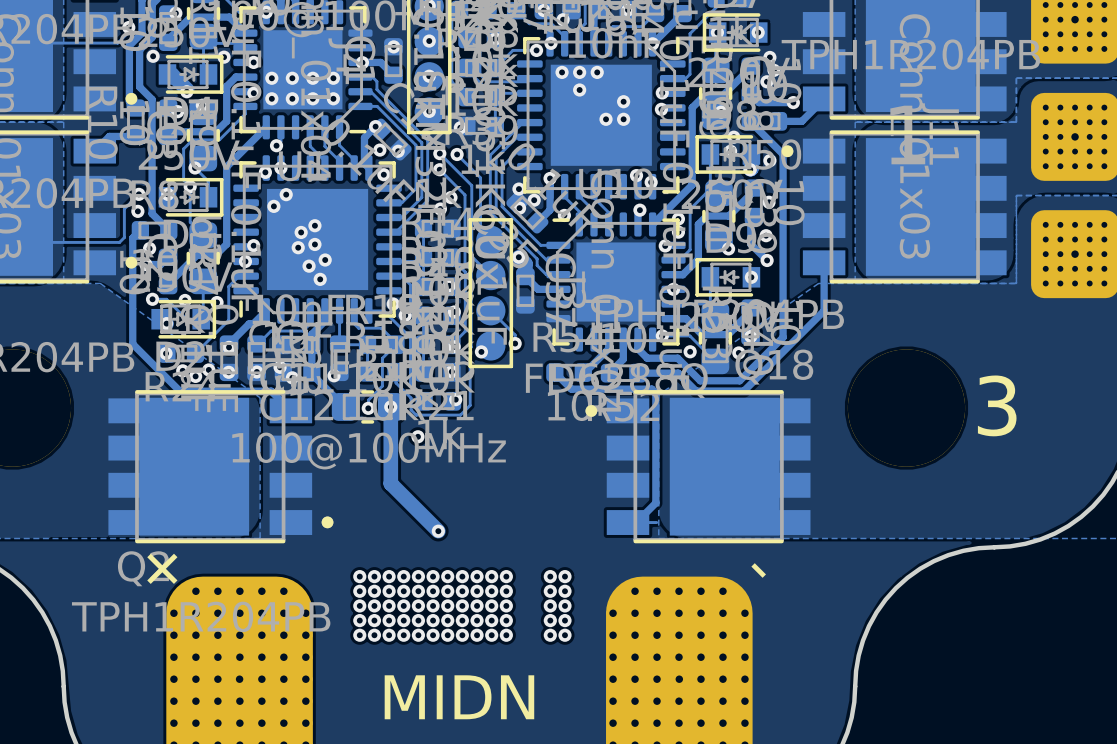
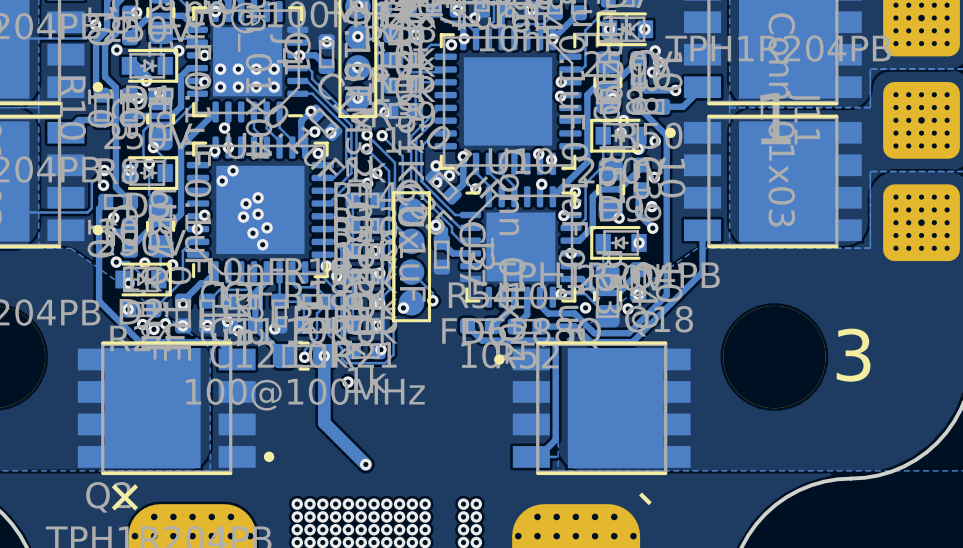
via: (562, 72) -> none
via: (579, 72) -> none
via: (597, 72) -> none
via: (579, 89) -> none
via: (623, 101) -> none
via: (606, 119) -> none
via: (623, 119) -> none

